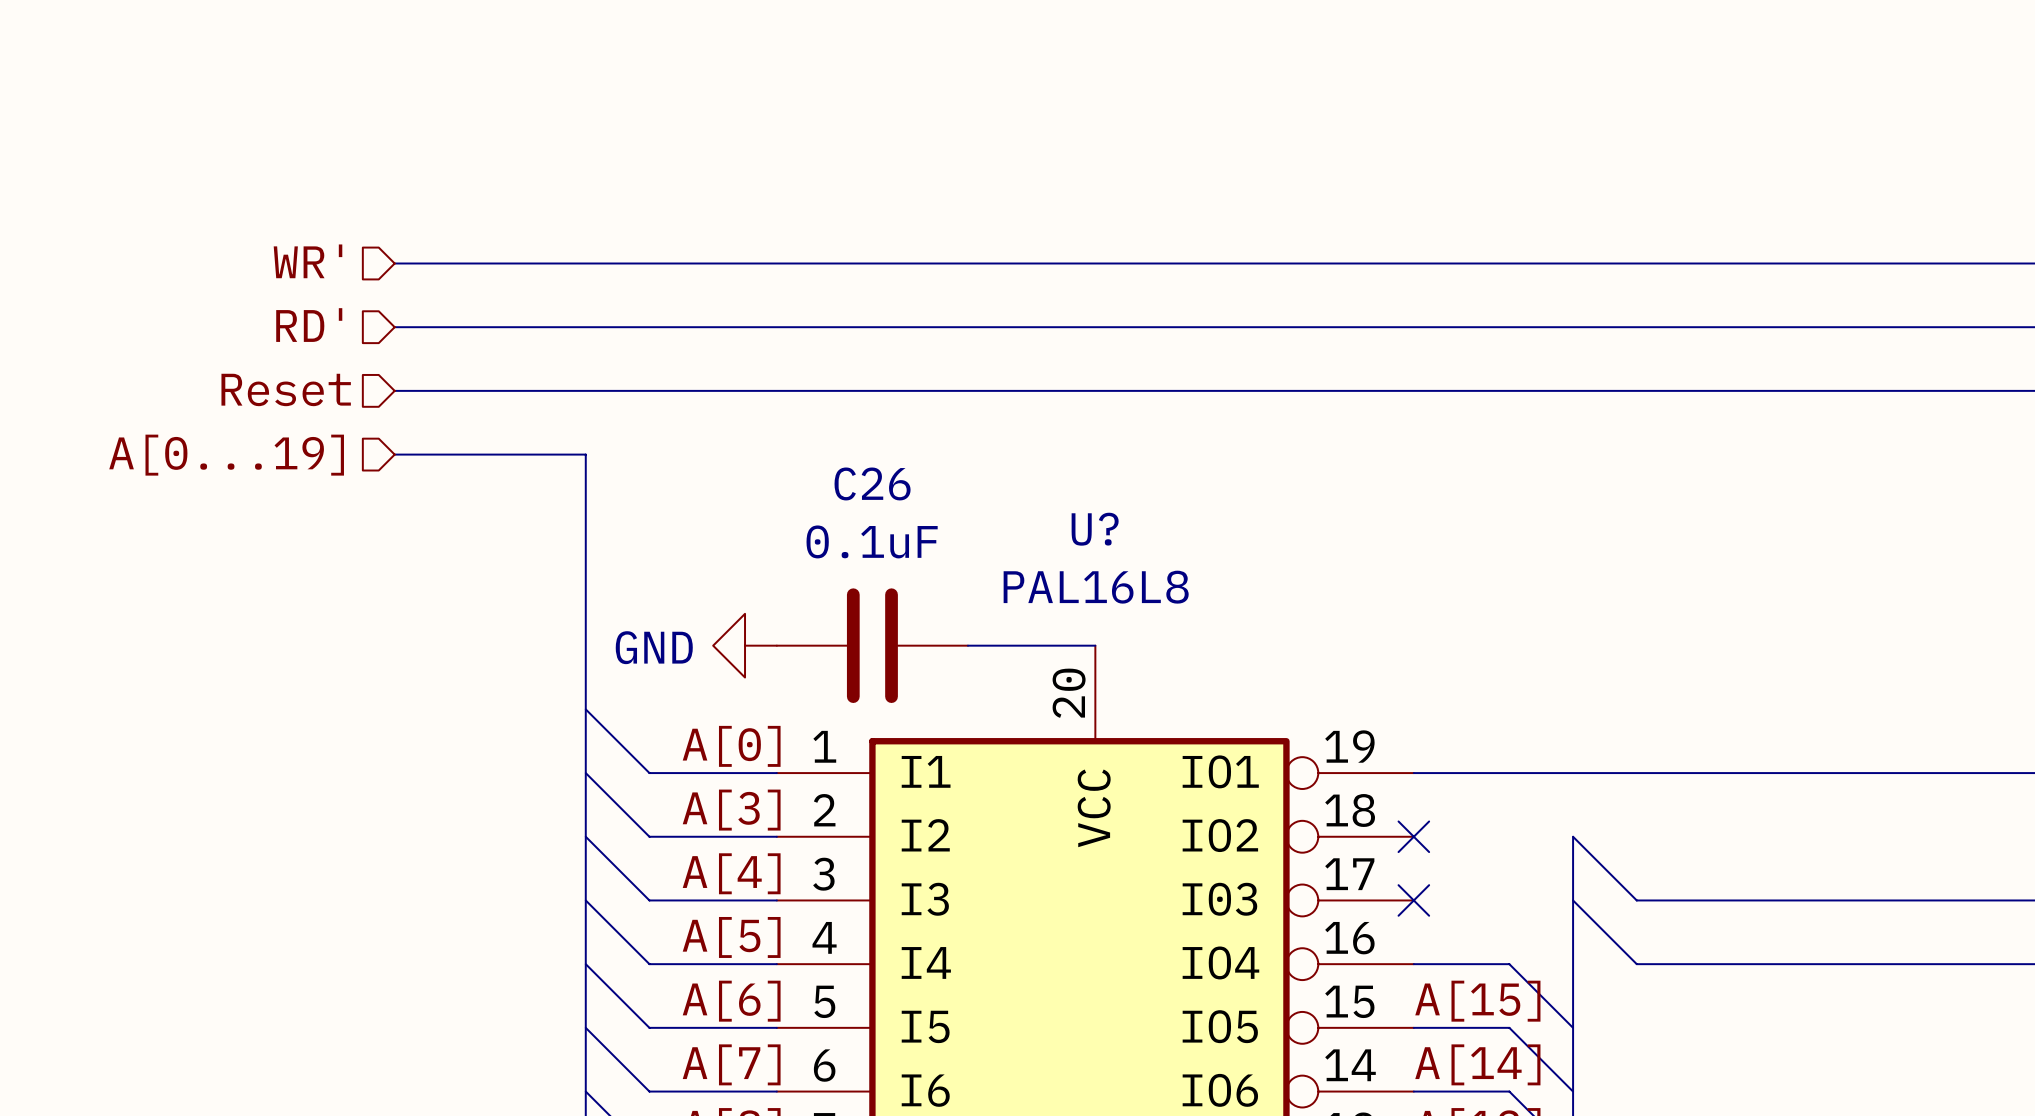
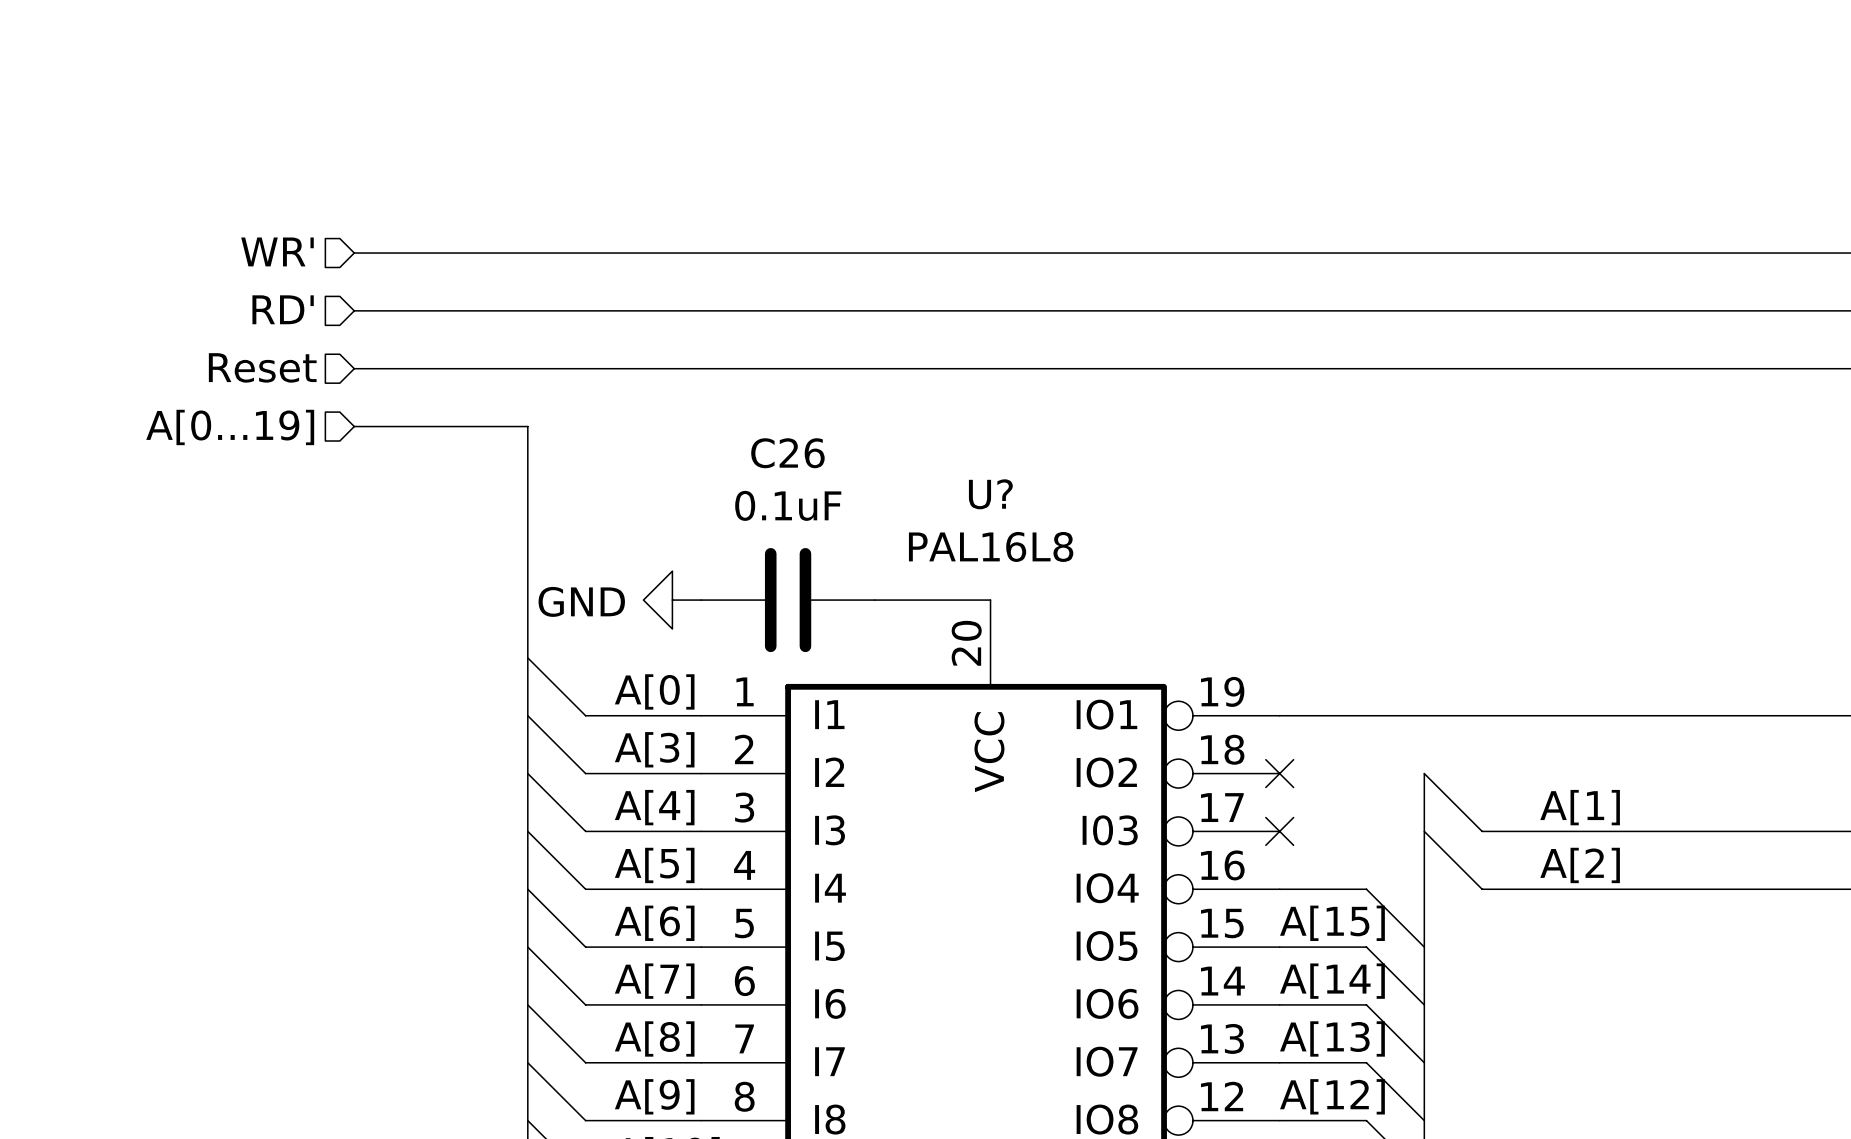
label: none -> A[1] (1580, 807)
label: none -> A[2] (1580, 865)

